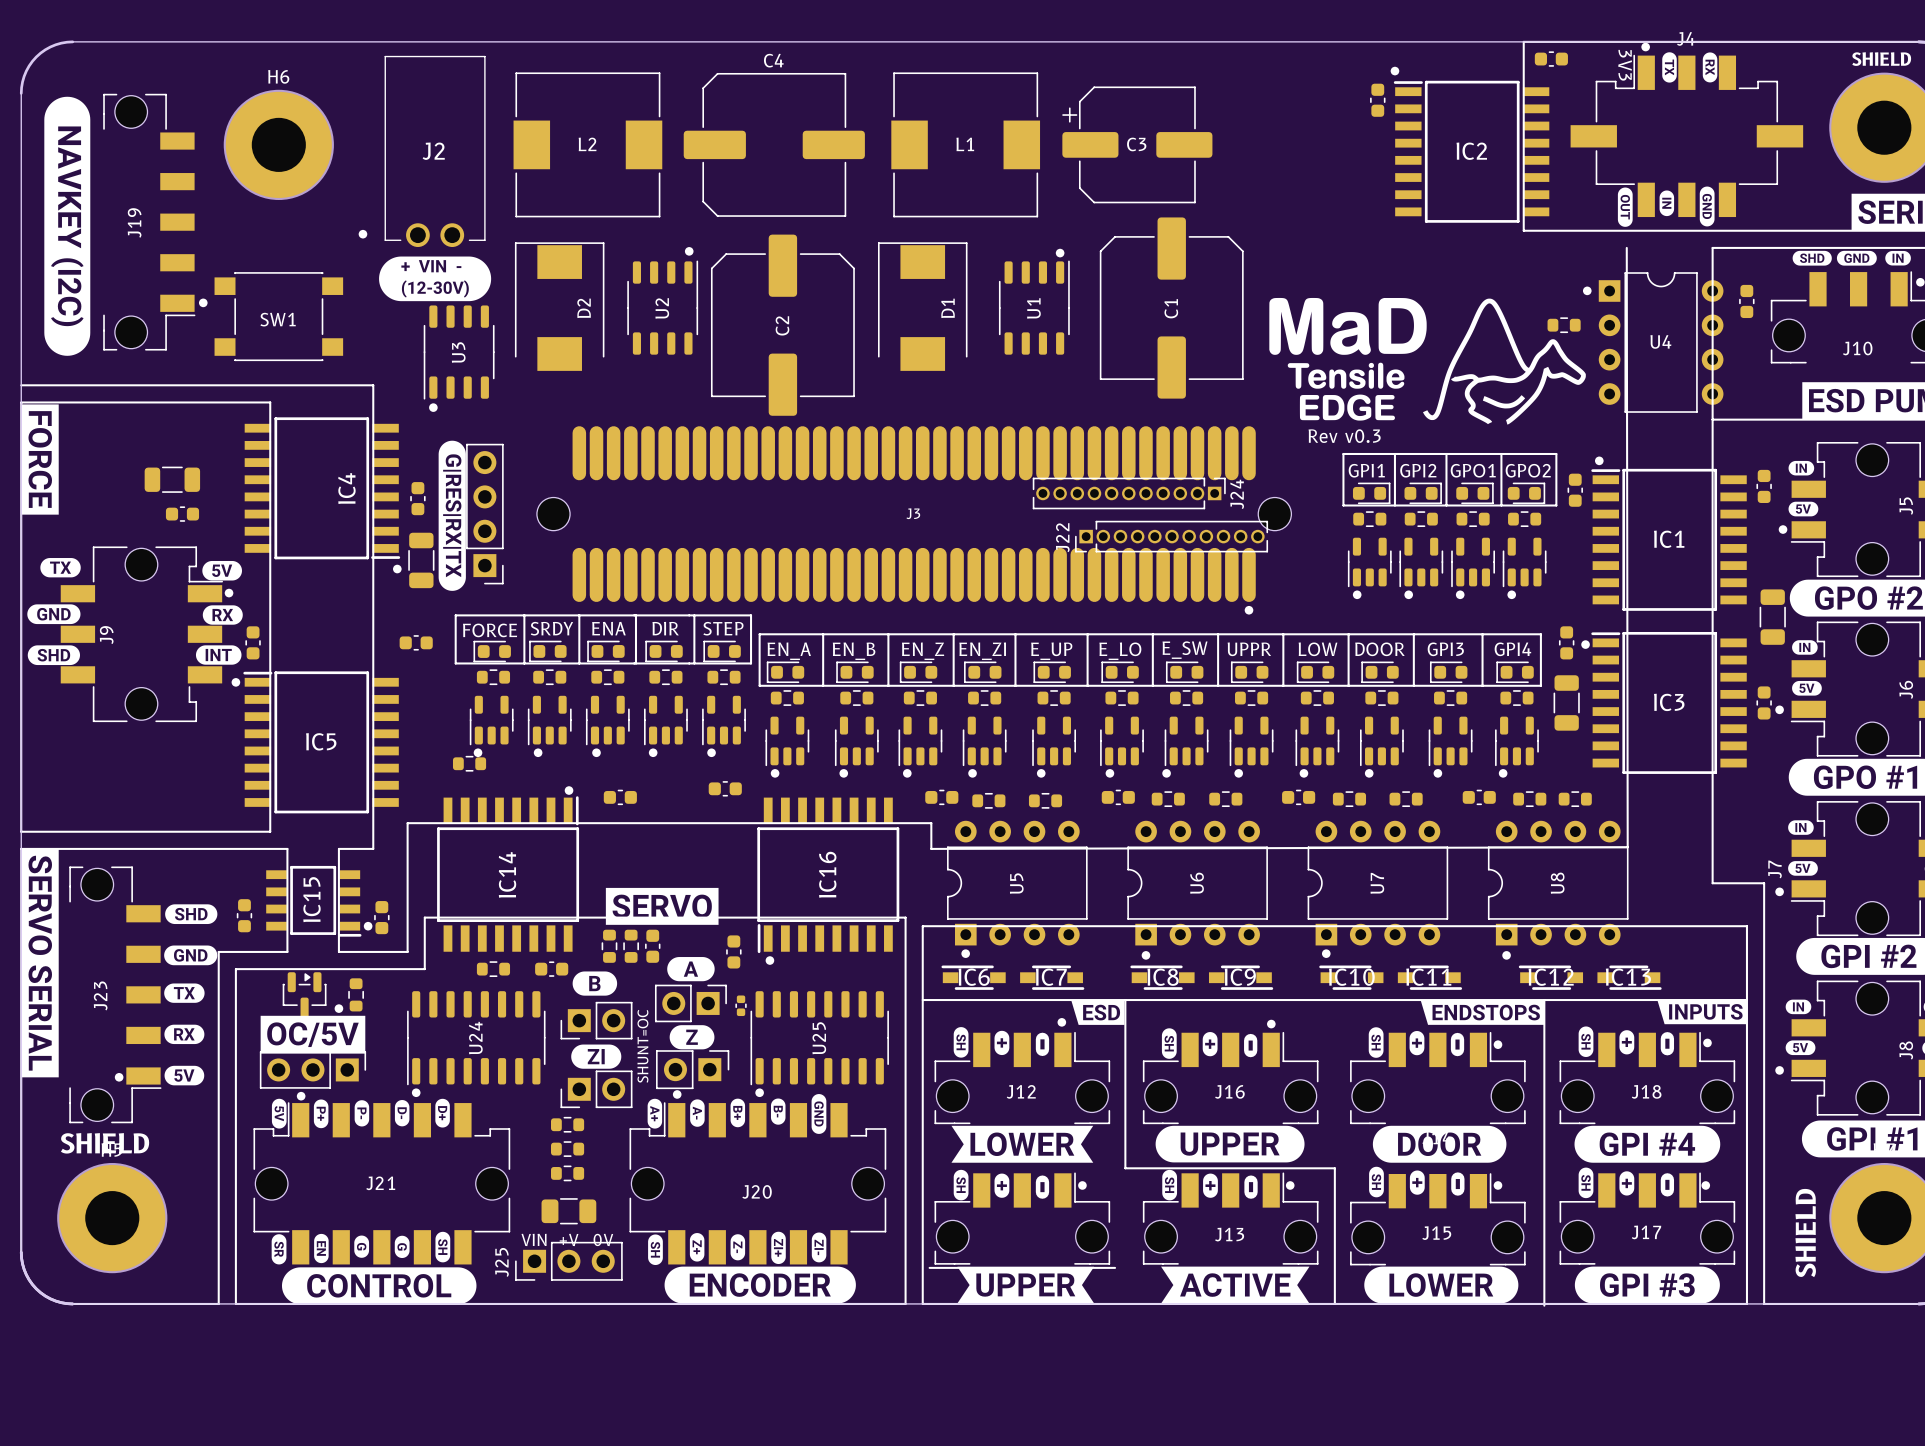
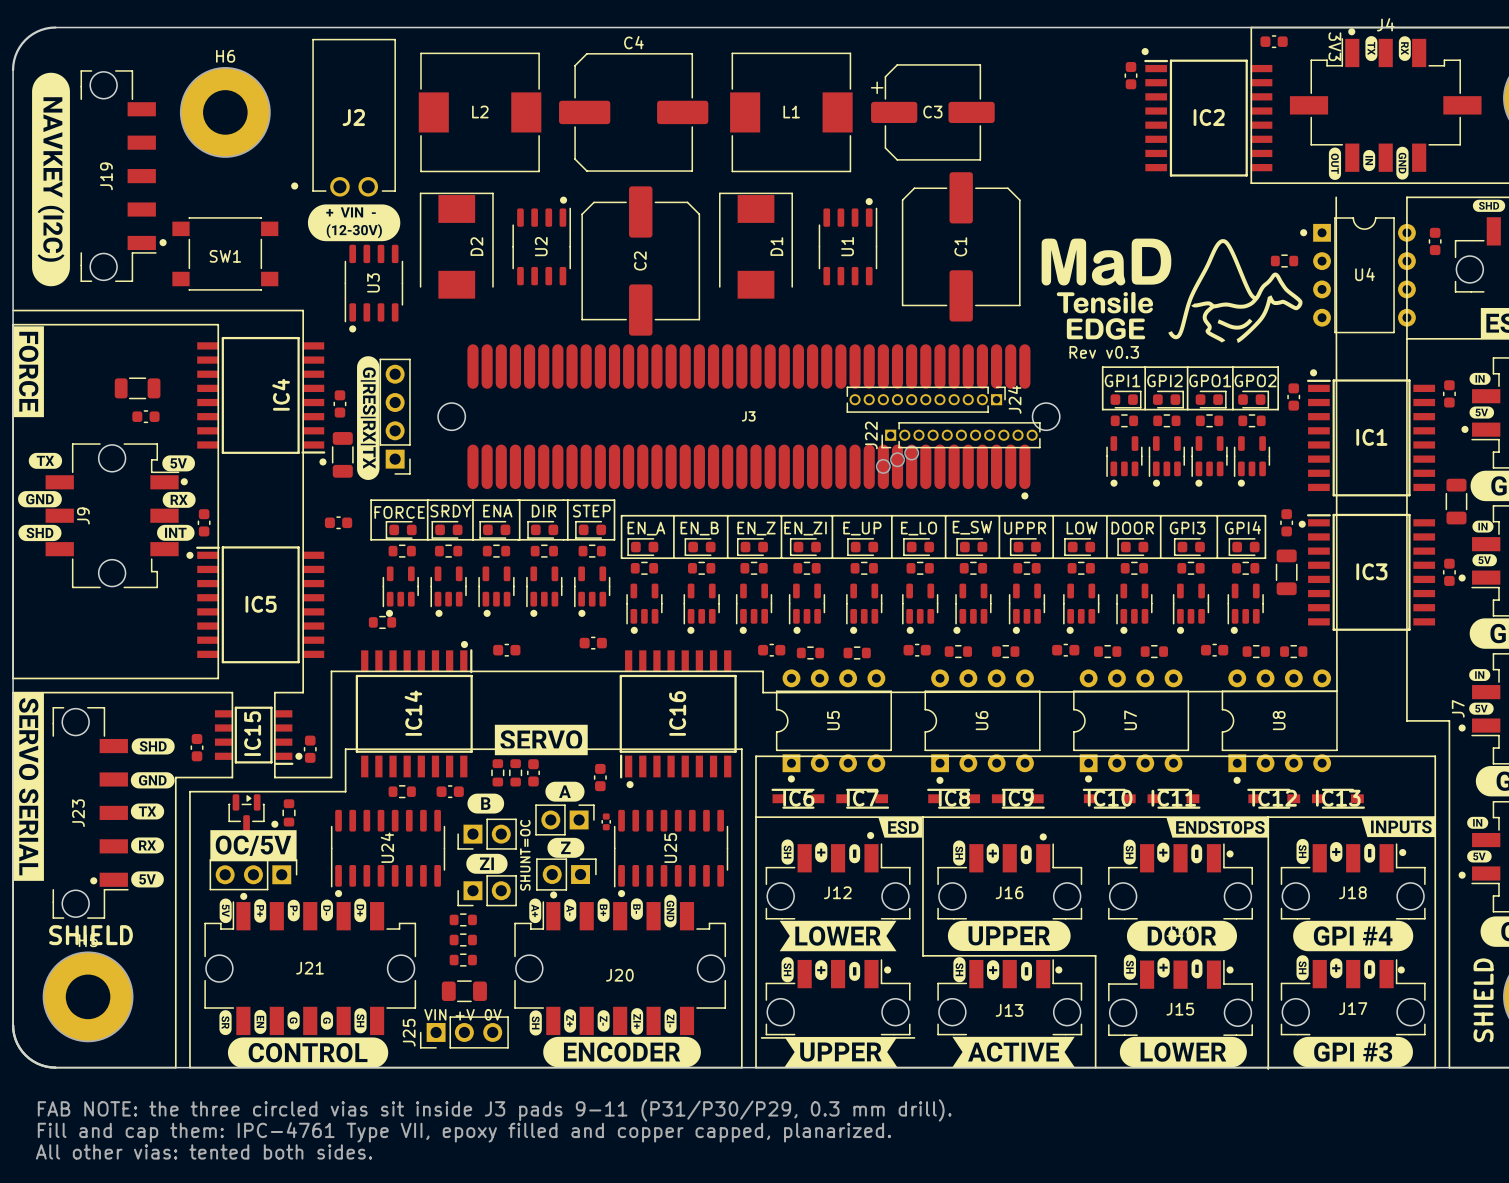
drawing: none -> [876, 445, 919, 474]
text: none -> FAB NOTE: the three circled vias sit inside J3 pads 9-11 (P31/P30/P29, 0.3 mm drill). (494, 1110)
text: none -> Fill and cap them: IPC-4761 Type VII, epoxy filled and copper capped, planarized. (464, 1132)
text: none -> All other vias: tented both sides. (204, 1151)

